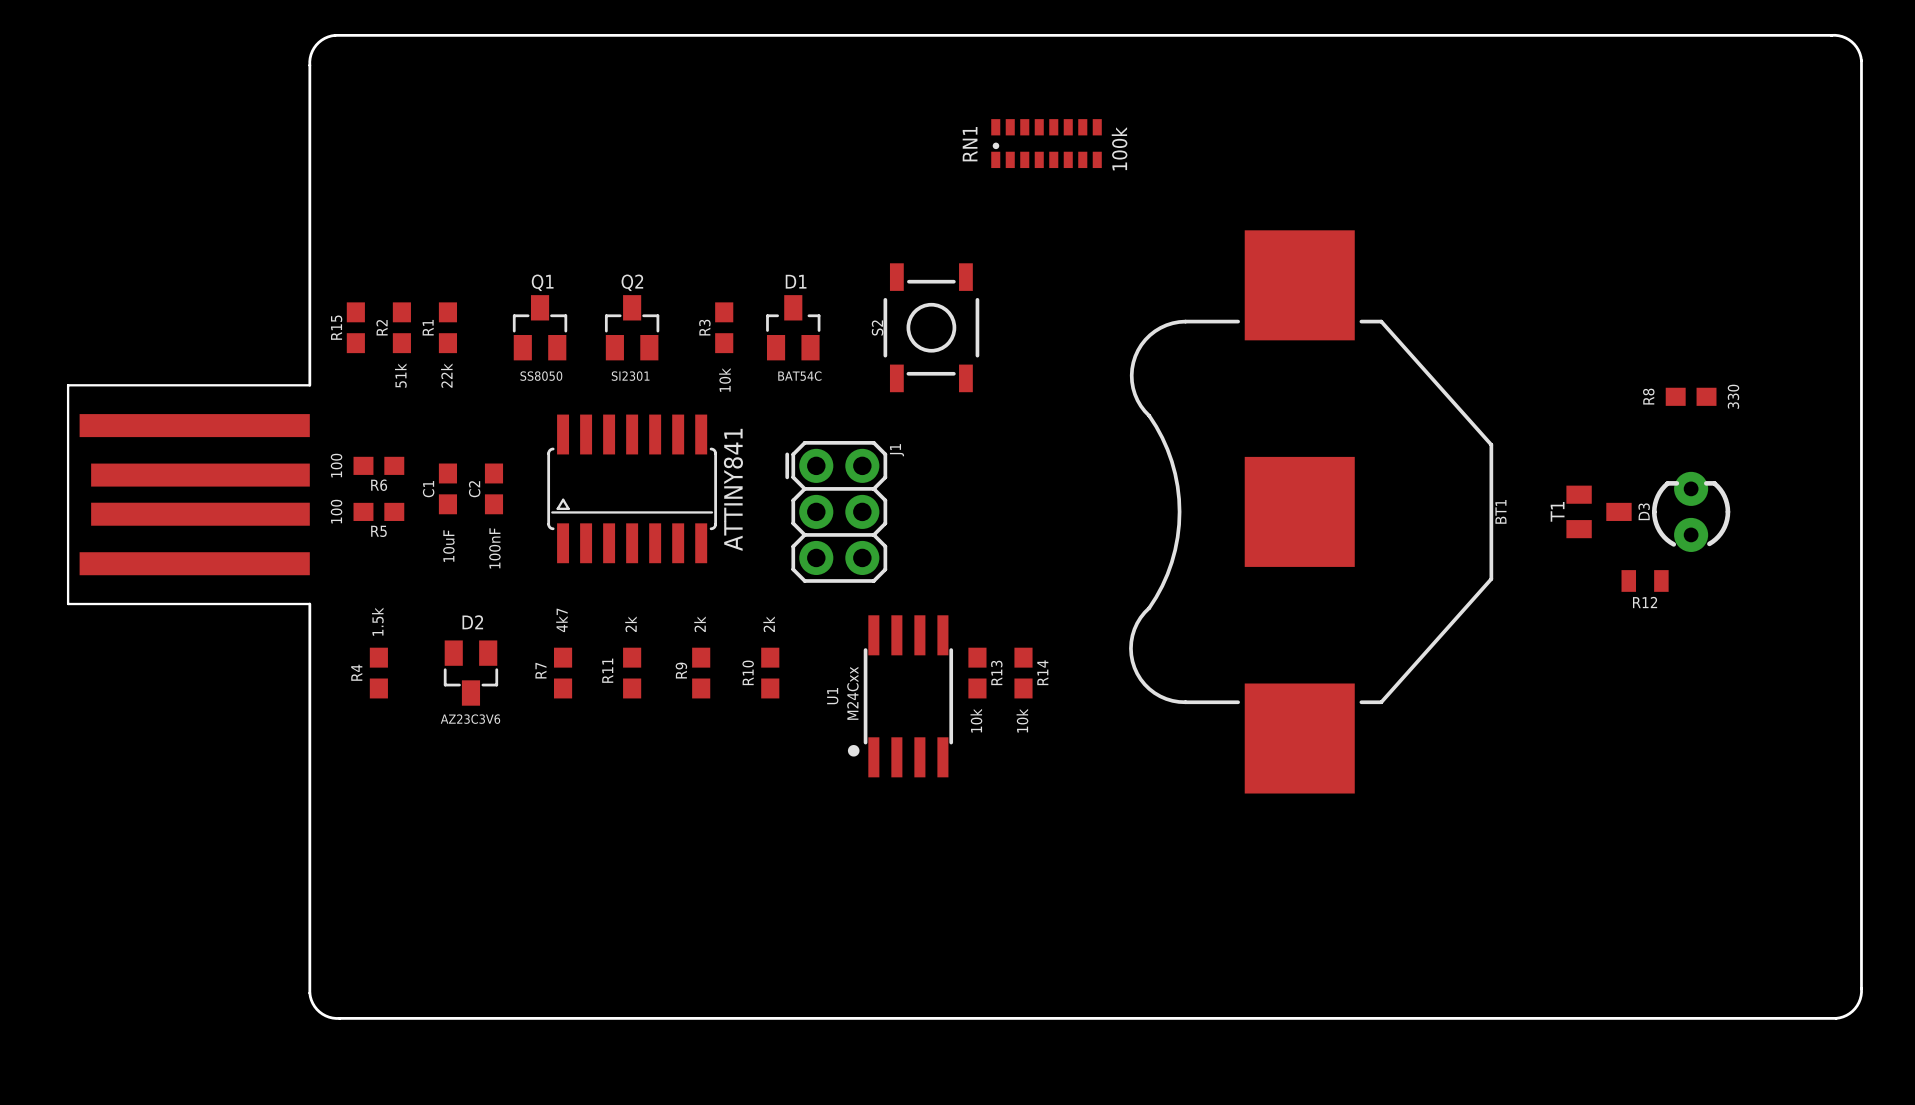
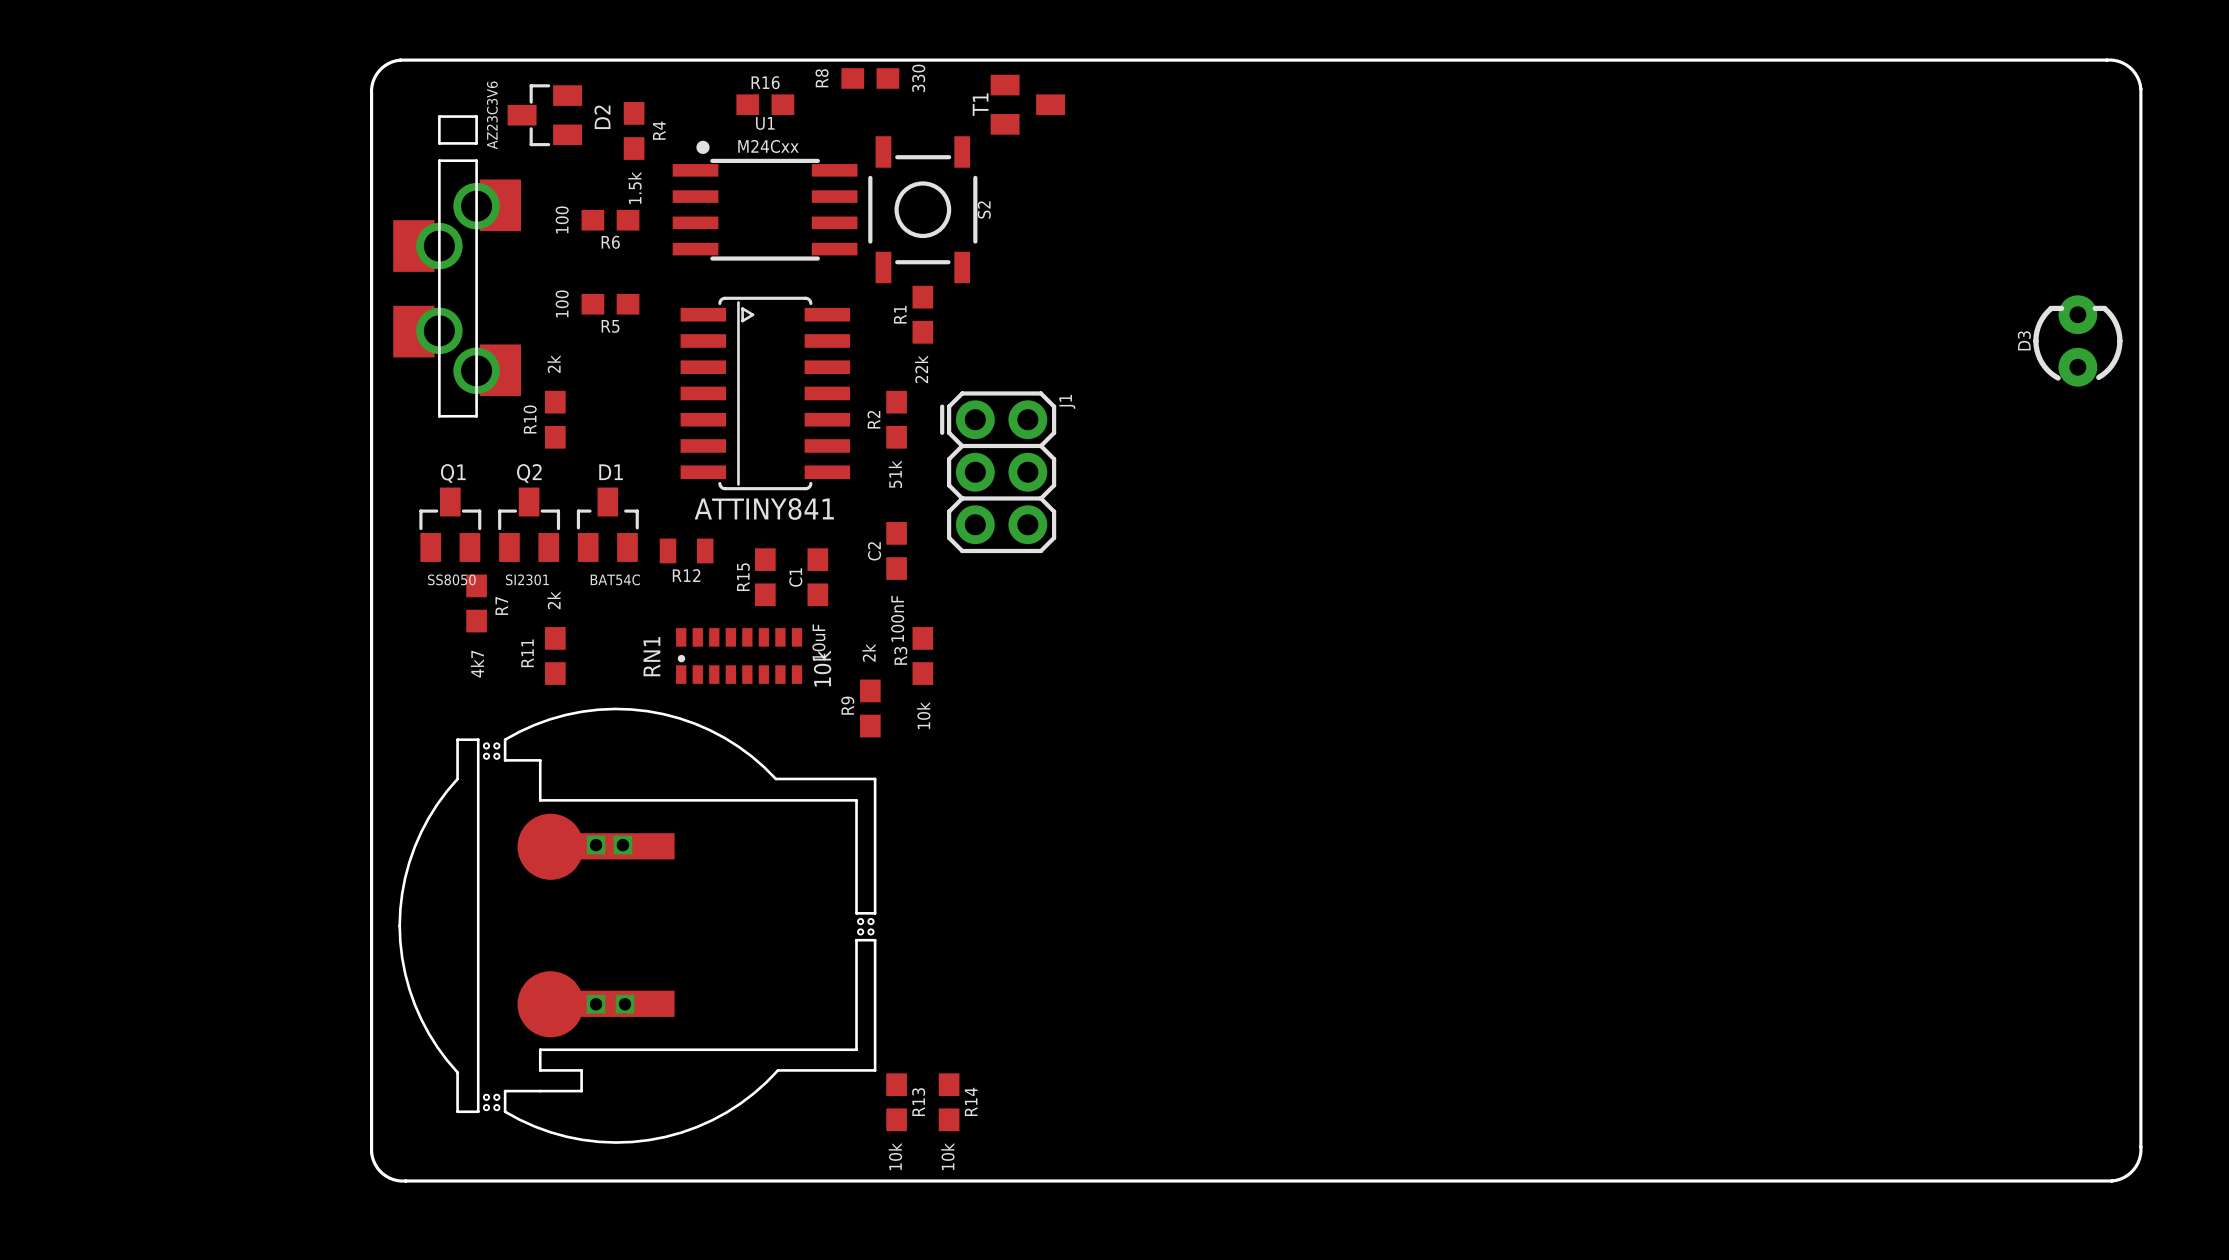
R16: none -> (765, 104)
RN1 position: (1046, 143) -> (739, 655)
RN1 value: 100k (1119, 148) -> 10k (822, 668)
part: none -> (457, 266)
R15 position: (355, 327) -> (765, 577)
R2 position: (401, 327) -> (896, 419)
R1 position: (447, 327) -> (922, 314)
Q1 position: (540, 327) -> (450, 524)
Q2 position: (632, 327) -> (529, 524)
R3 position: (724, 327) -> (922, 655)
D1 position: (793, 327) -> (607, 524)
S2 rotation: 0° (931, 327) -> 180° (922, 209)
S2 position: (931, 327) -> (922, 209)
board edge: none -> (371, 459) (371, 708)
R8 position: (1691, 396) -> (870, 78)
R6 position: (378, 465) -> (610, 220)
C1 position: (447, 488) -> (817, 577)
C2 position: (493, 488) -> (896, 550)
part rotation: 0° (632, 488) -> 90° clockwise (765, 393)
part position: (632, 488) -> (765, 393)
part: (188, 494) -> none
R5 position: (378, 511) -> (610, 304)
J1 position: (836, 511) -> (998, 472)
BT1: (1311, 511) -> none
T1 position: (1599, 511) -> (1027, 104)
D3 position: (1691, 511) -> (2077, 340)
R12 position: (1645, 580) -> (686, 550)
R7 value position: 4k7 (561, 620) -> 4k7 (477, 664)
R4 value position: 1.5k (377, 621) -> 1.5k (634, 187)
R7 name position: R7 (540, 670) -> R7 (501, 606)
R4 name position: R4 (356, 672) -> R4 (659, 130)
R4 position: (378, 673) -> (634, 130)
D2 rotation: 0° (470, 673) -> 90° clockwise (544, 115)
D2 position: (470, 673) -> (544, 115)
R7 position: (563, 673) -> (476, 603)
R11 position: (632, 673) -> (555, 655)
R9 position: (701, 673) -> (870, 708)
R10 position: (770, 673) -> (555, 419)
R13 position: (977, 673) -> (896, 1102)
R14 position: (1023, 673) -> (949, 1102)
U1 rotation: 0° (900, 696) -> 90° clockwise (765, 200)
U1 position: (900, 696) -> (765, 200)
part: none -> (637, 925)

